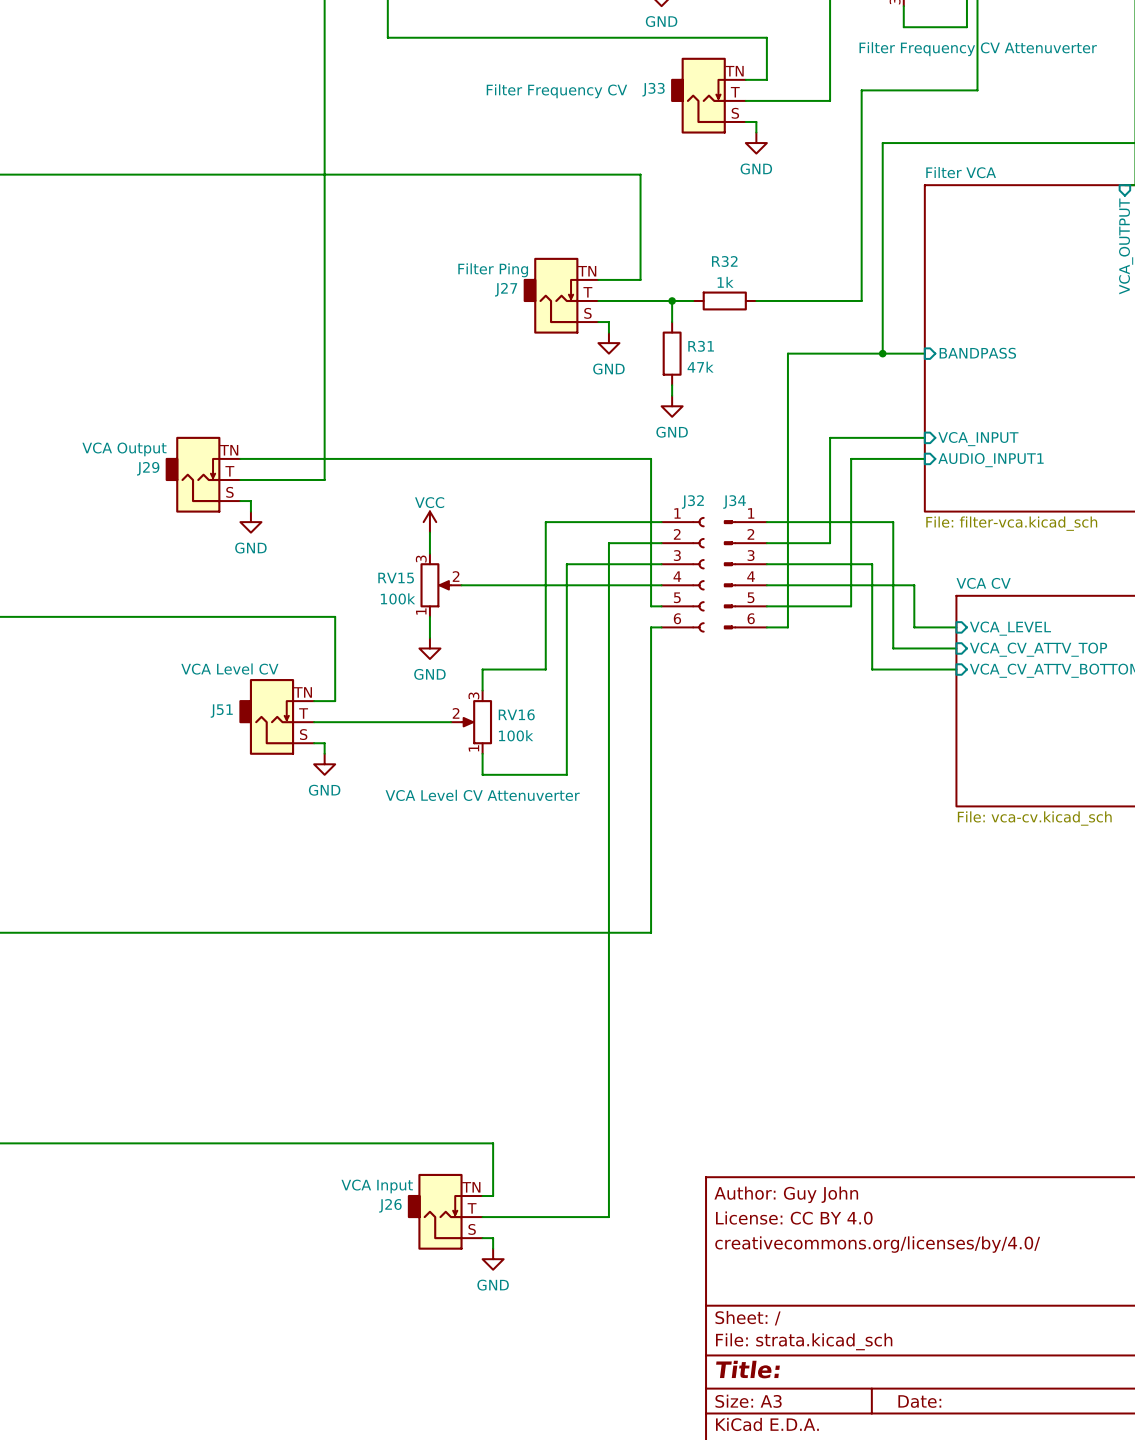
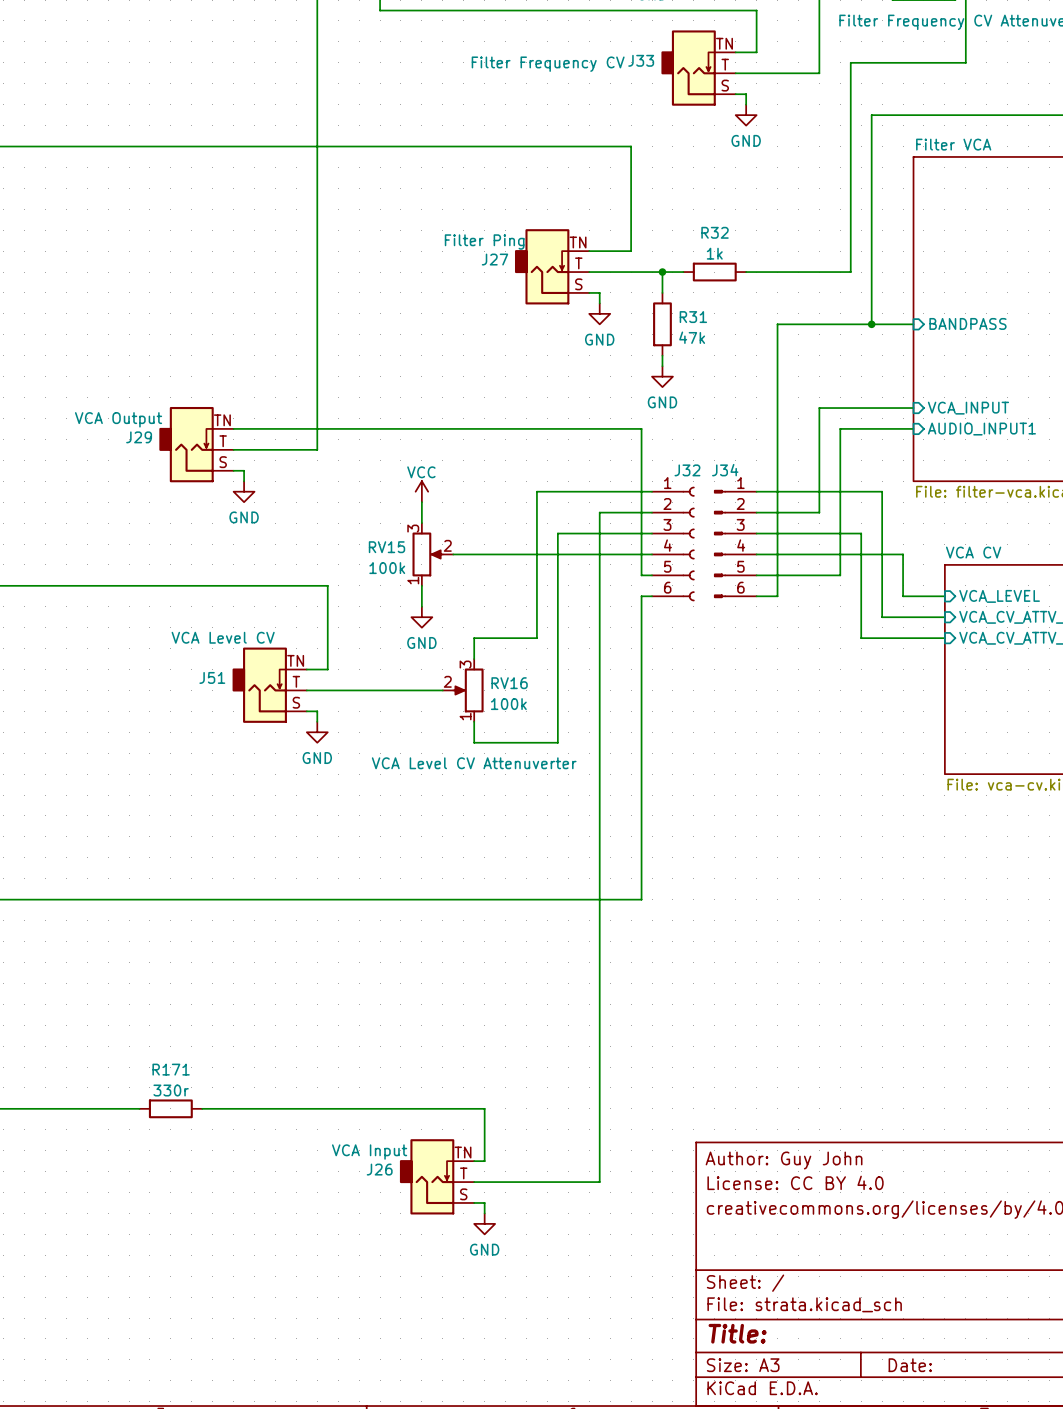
wire: (145, 1143) (208, 1143) -> none
R171: none -> 330r (170, 1108)

